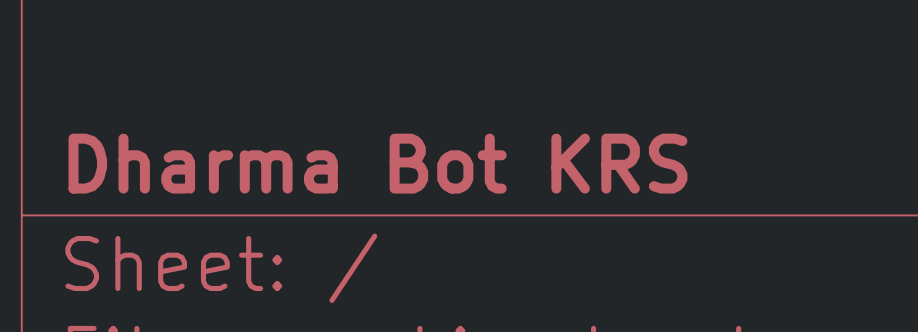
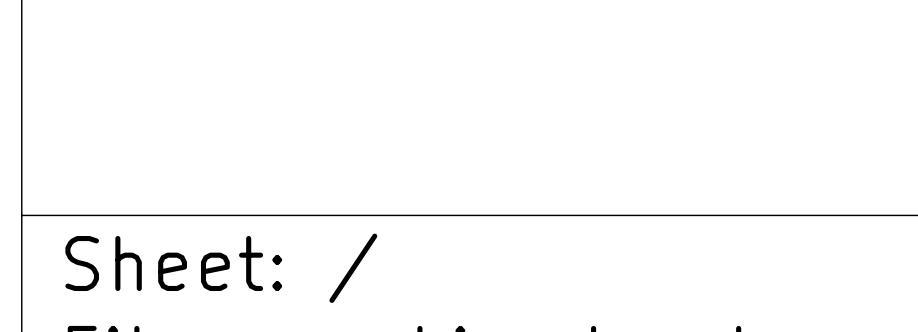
title block: Dharma Bot KRS (377, 163) -> none

